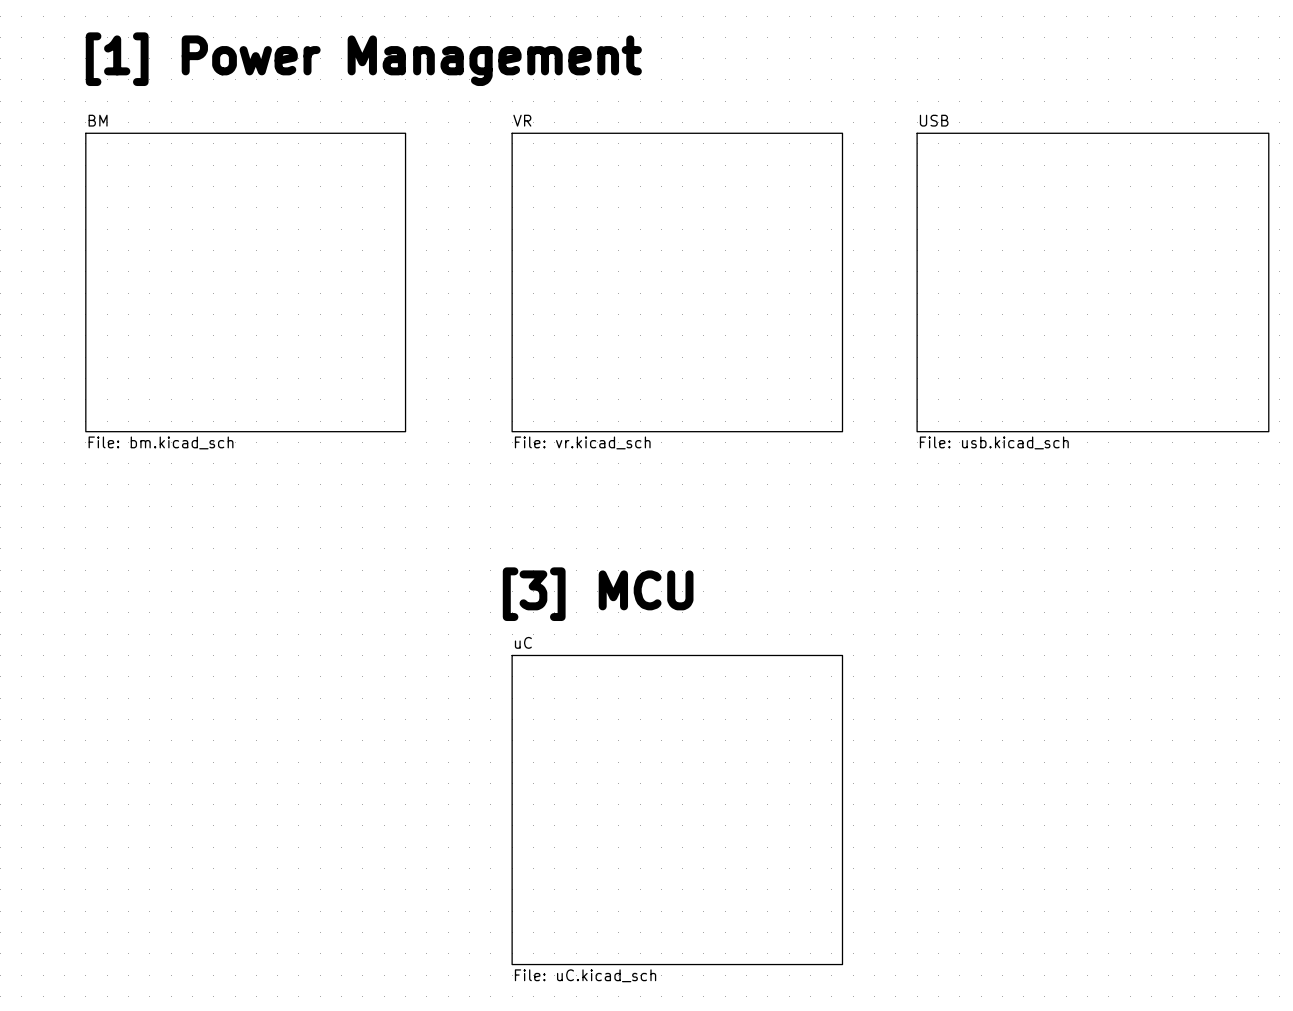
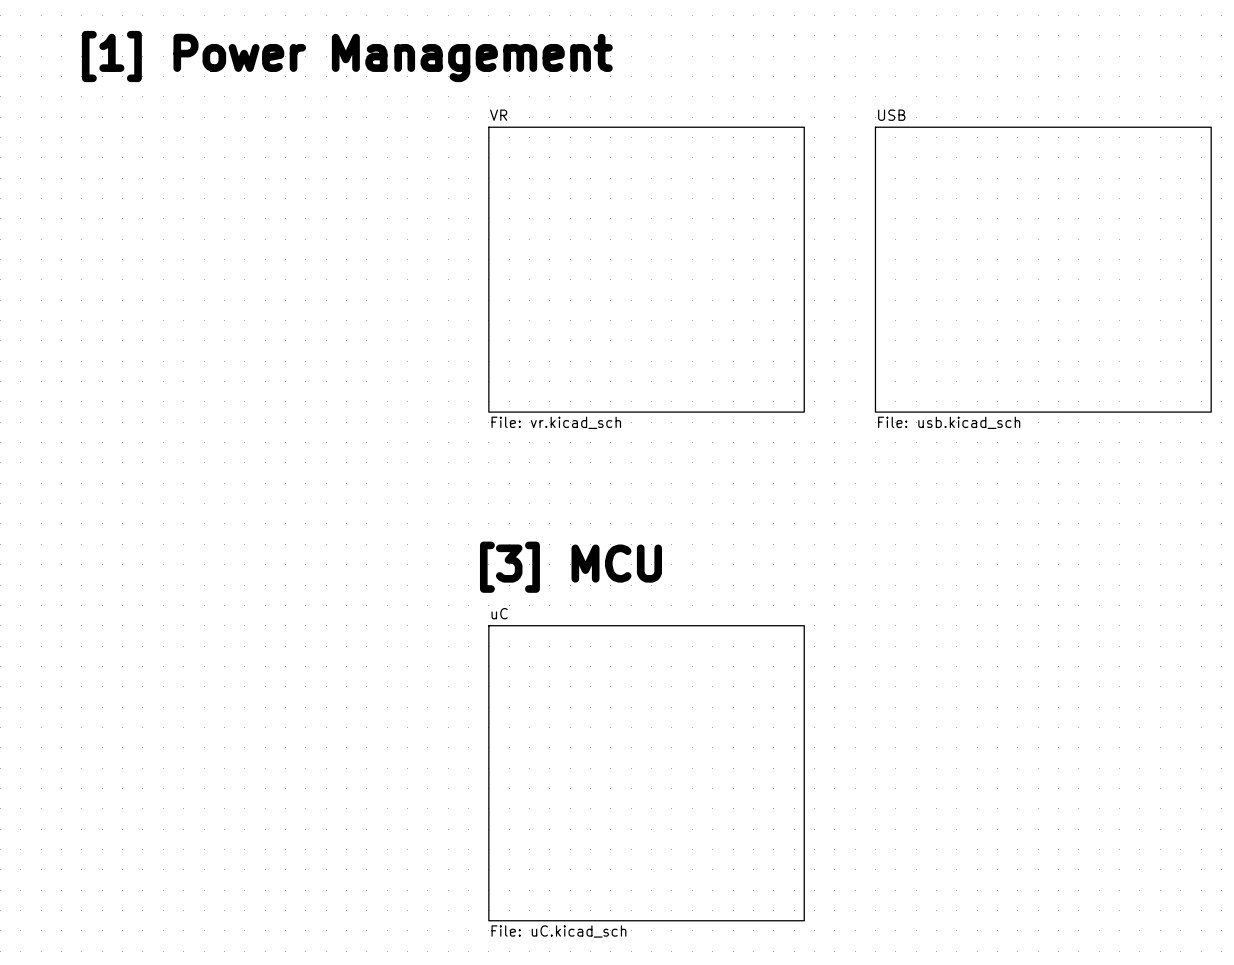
sheet BM: File: bm.kicad_sch (245, 282) -> none

